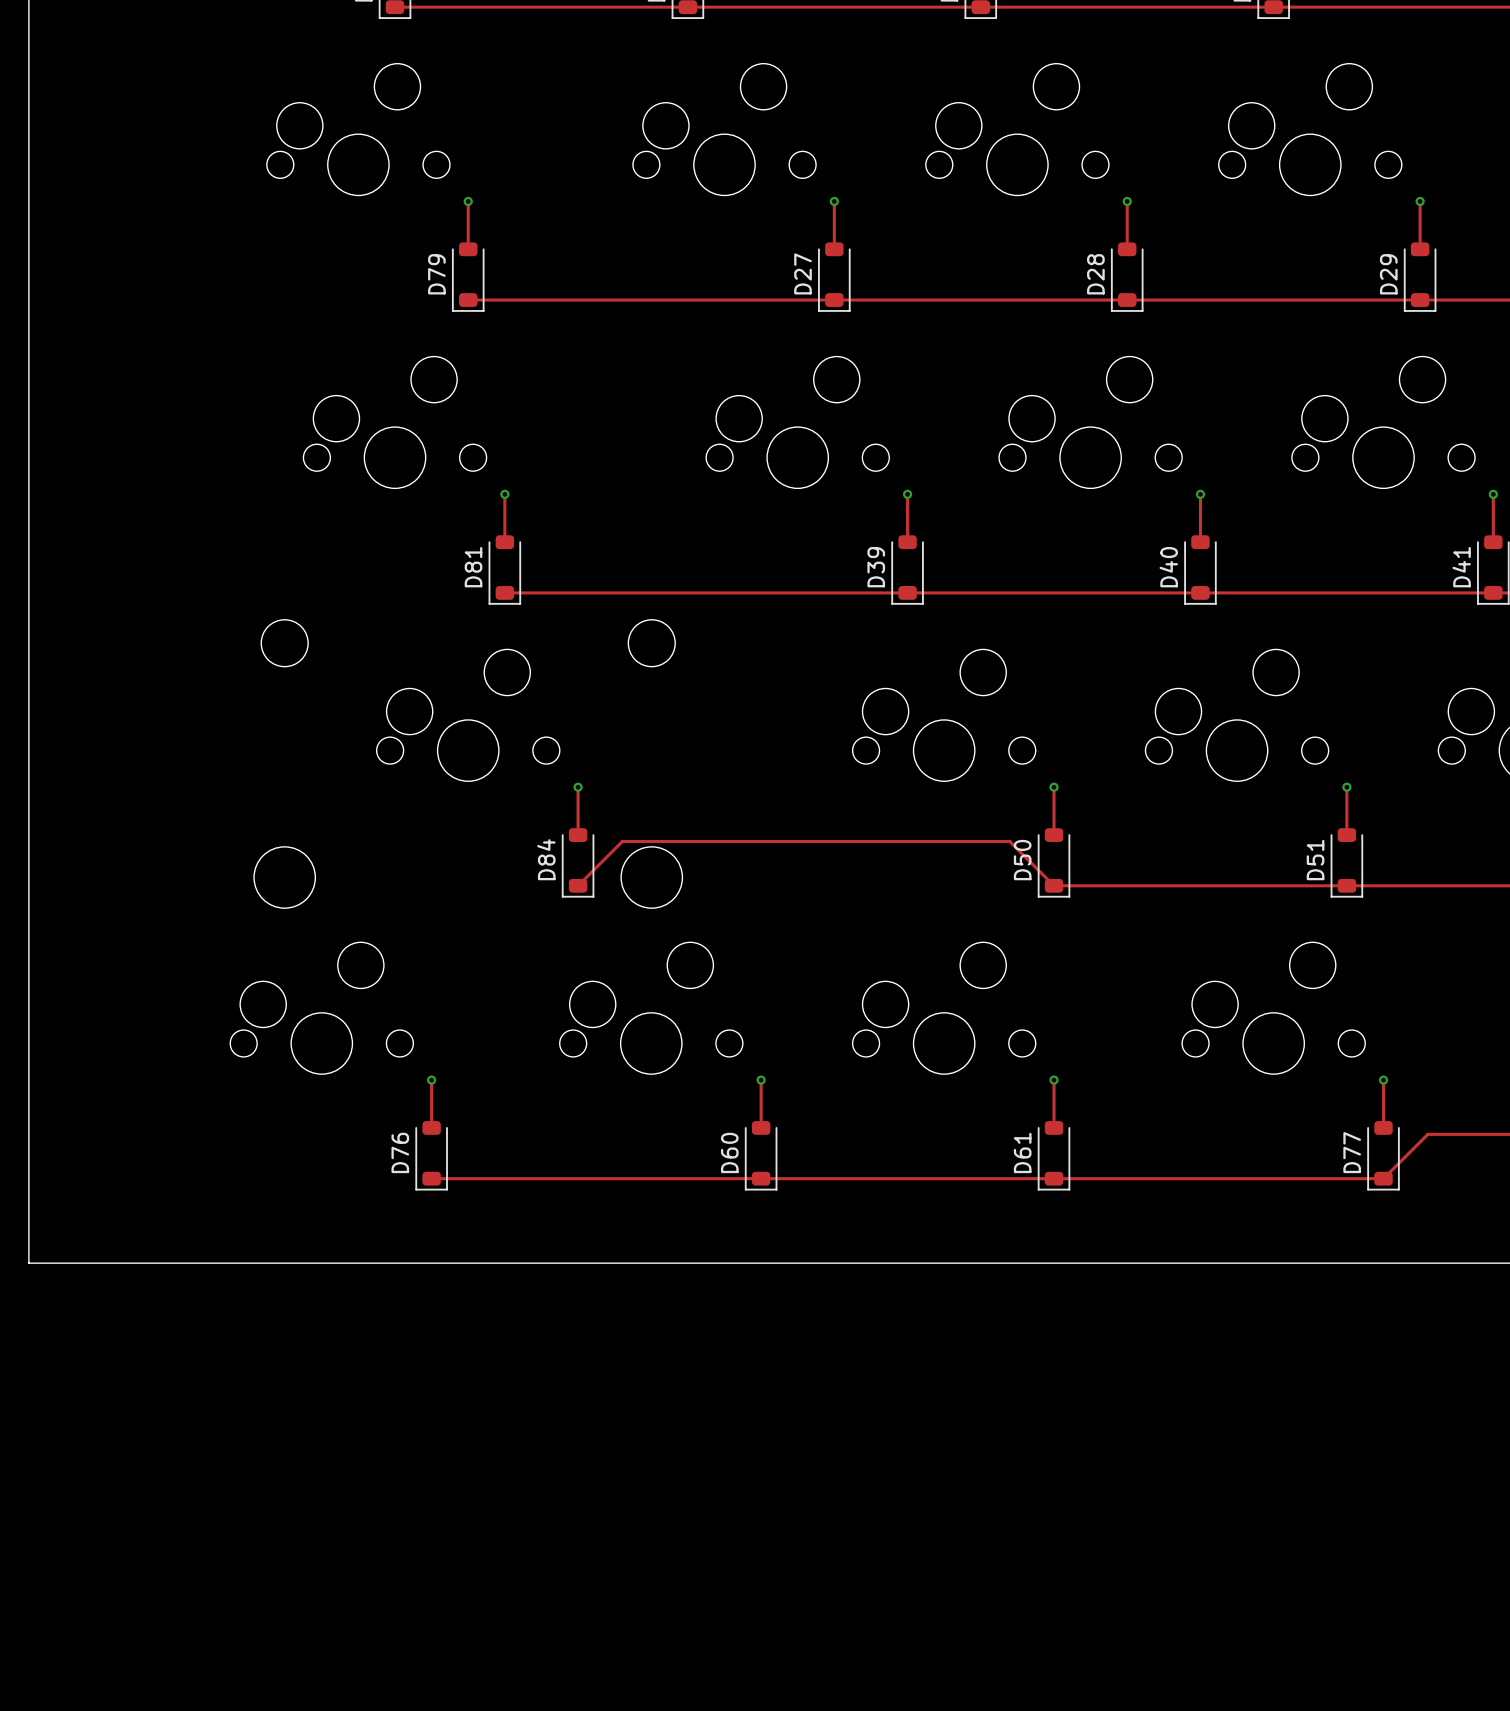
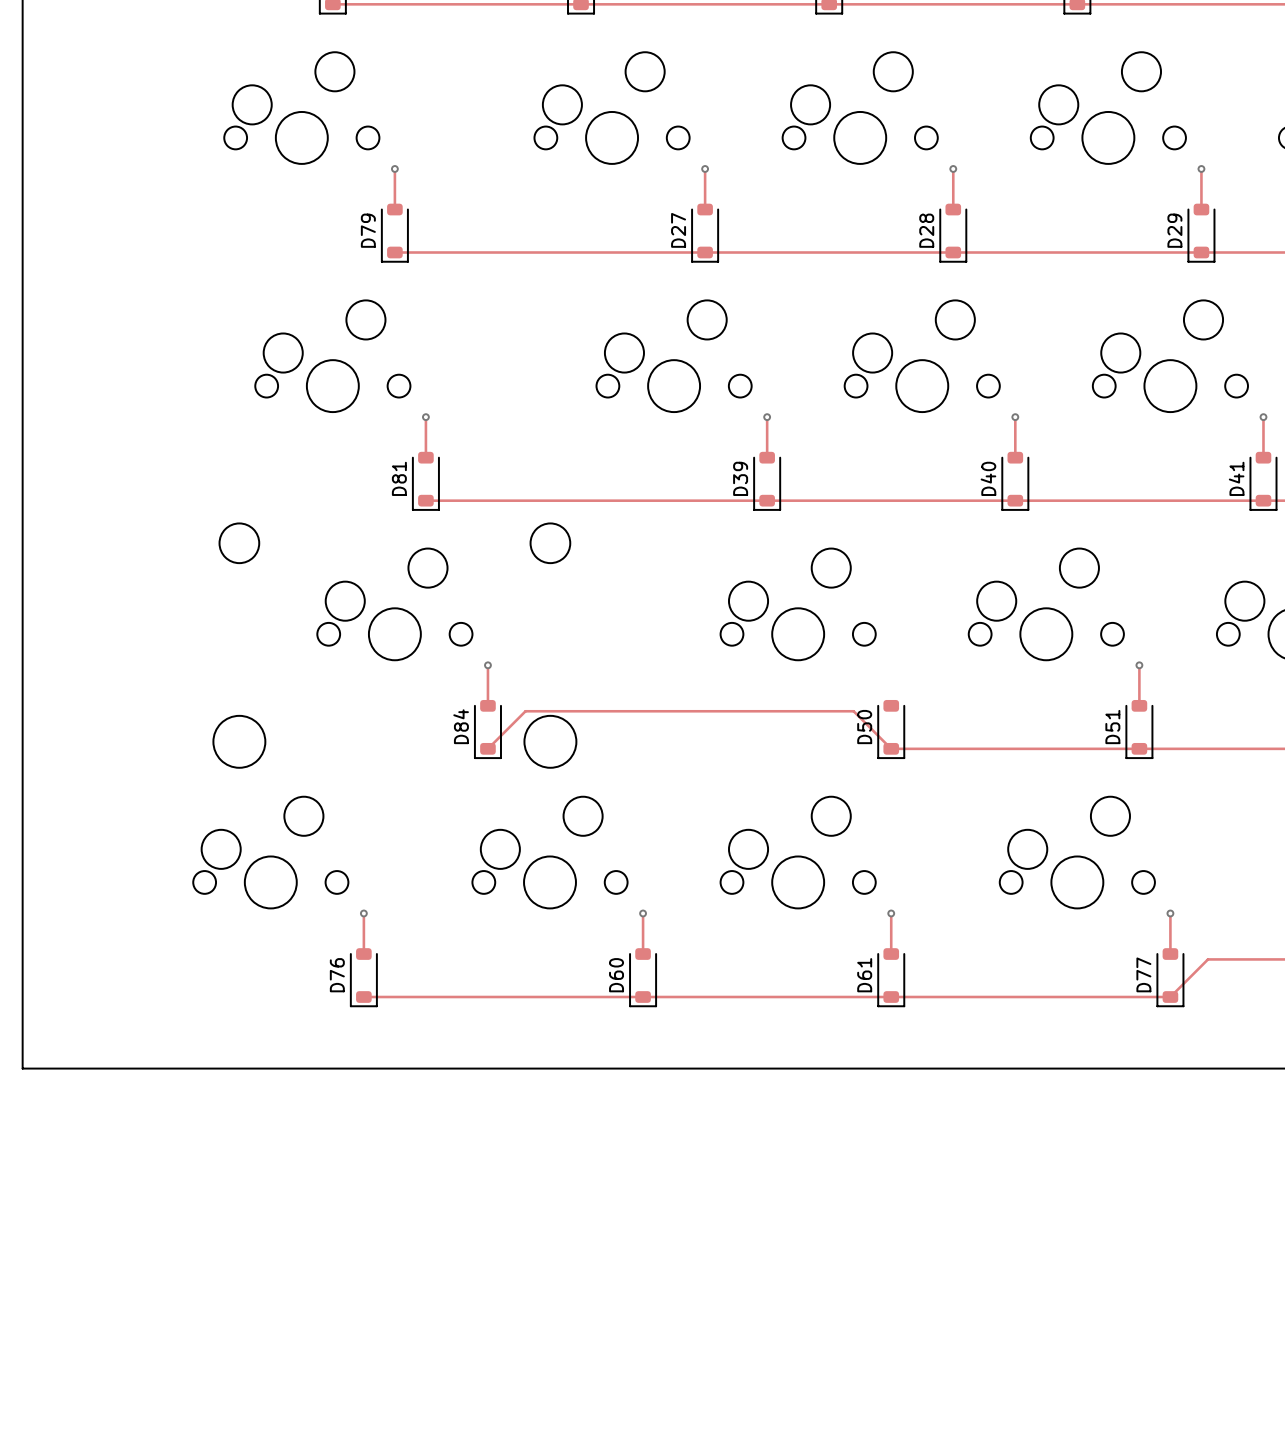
track: (1054, 787) (1054, 835) -> none
via: (1054, 787) -> none

